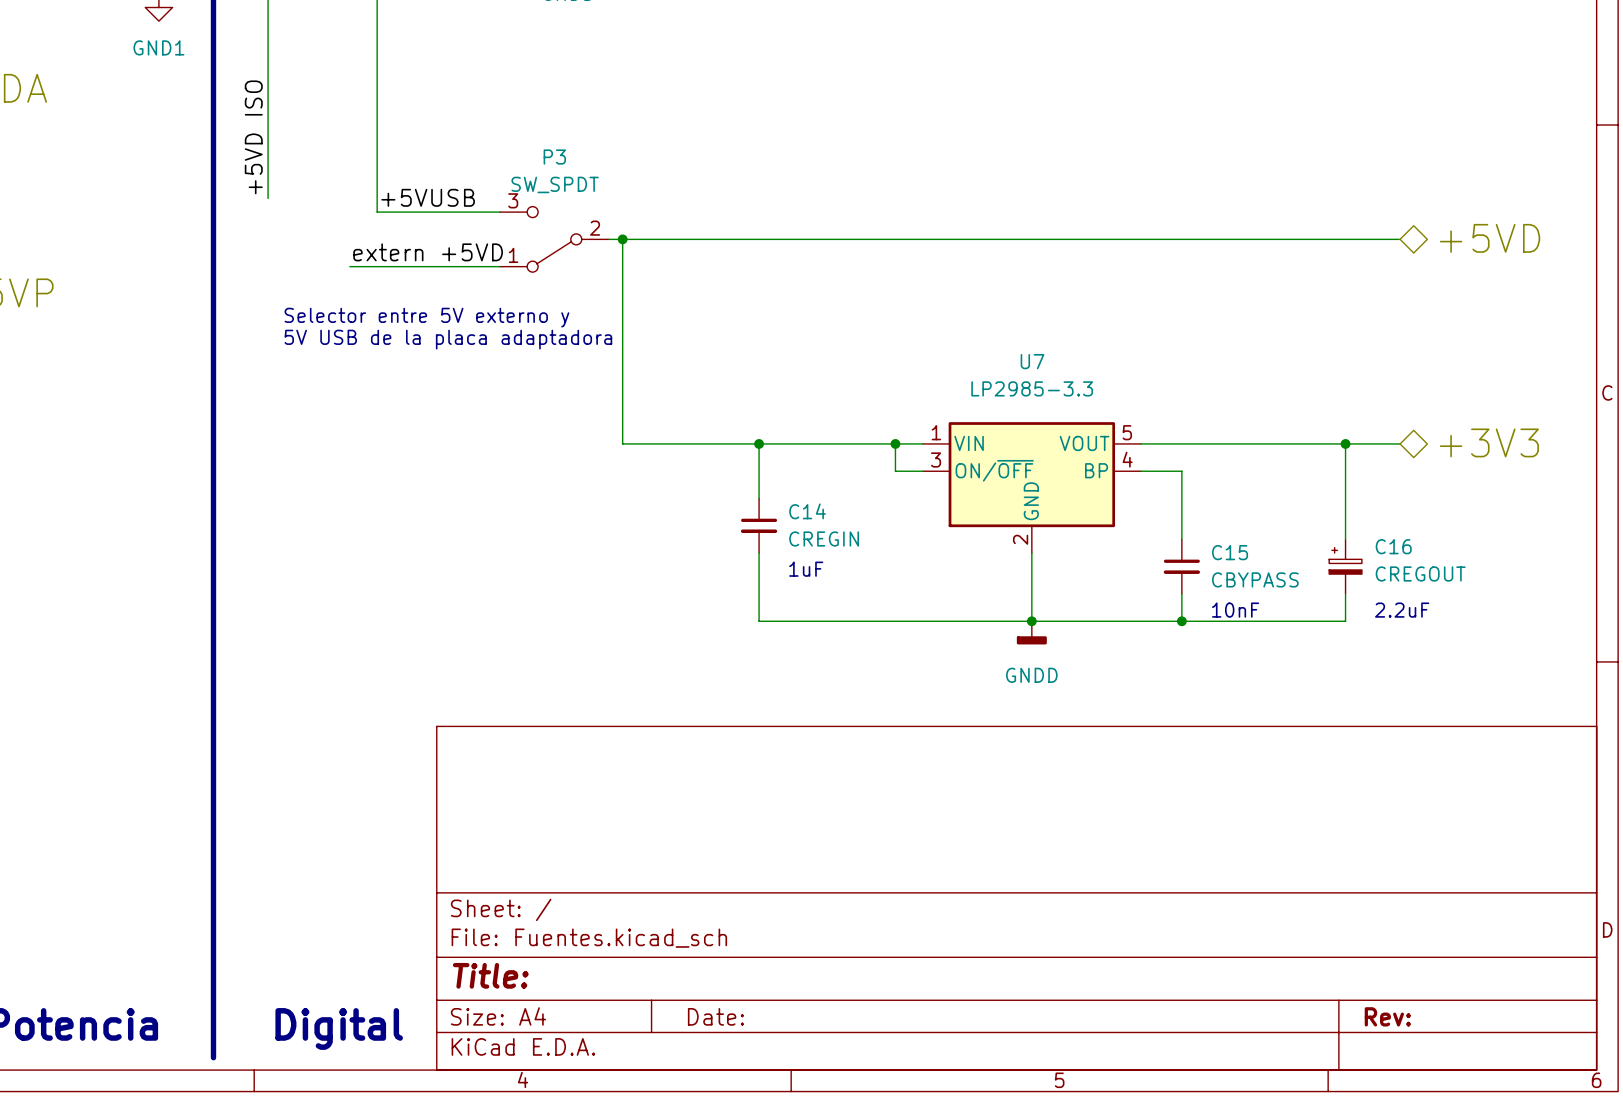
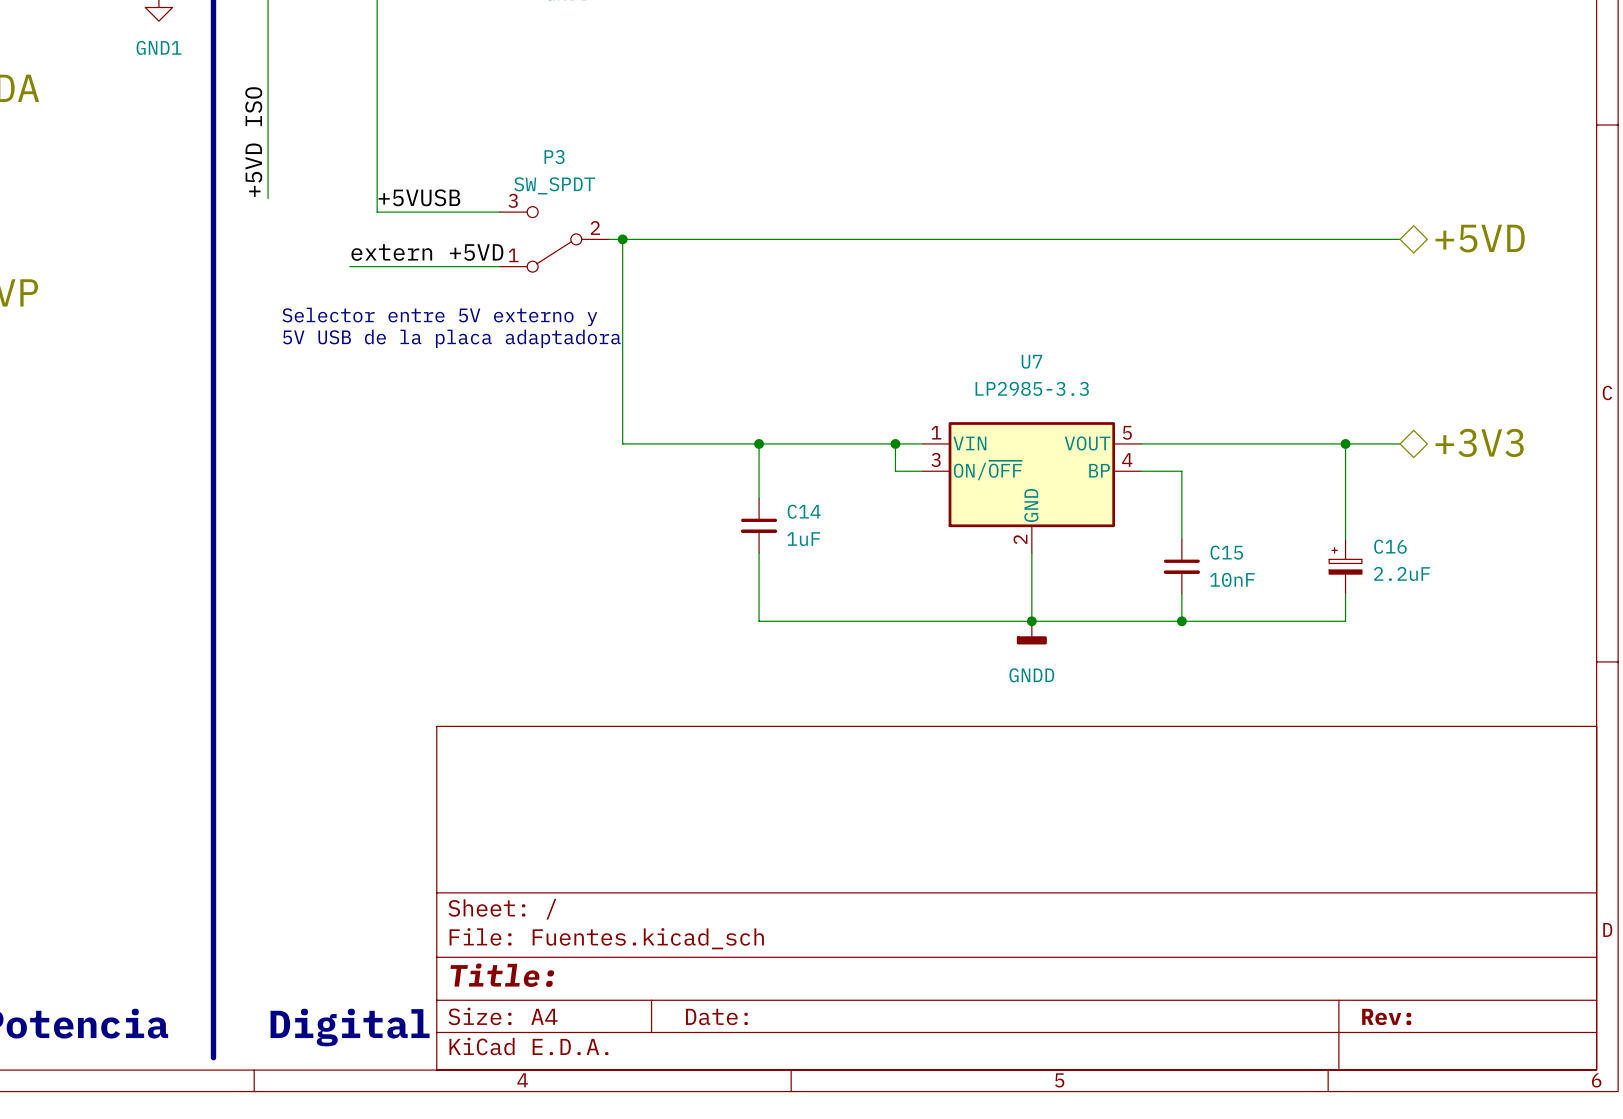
C14 value: CREGIN (824, 538) -> 1uF (803, 539)
text: 1uF (806, 569) -> none
C16 value: CREGOUT (1420, 573) -> 2.2uF (1402, 573)
C15 value: CBYPASS (1255, 579) -> 10nF (1232, 579)
text: 10nF (1235, 610) -> none
text: 2.2uF (1402, 610) -> none

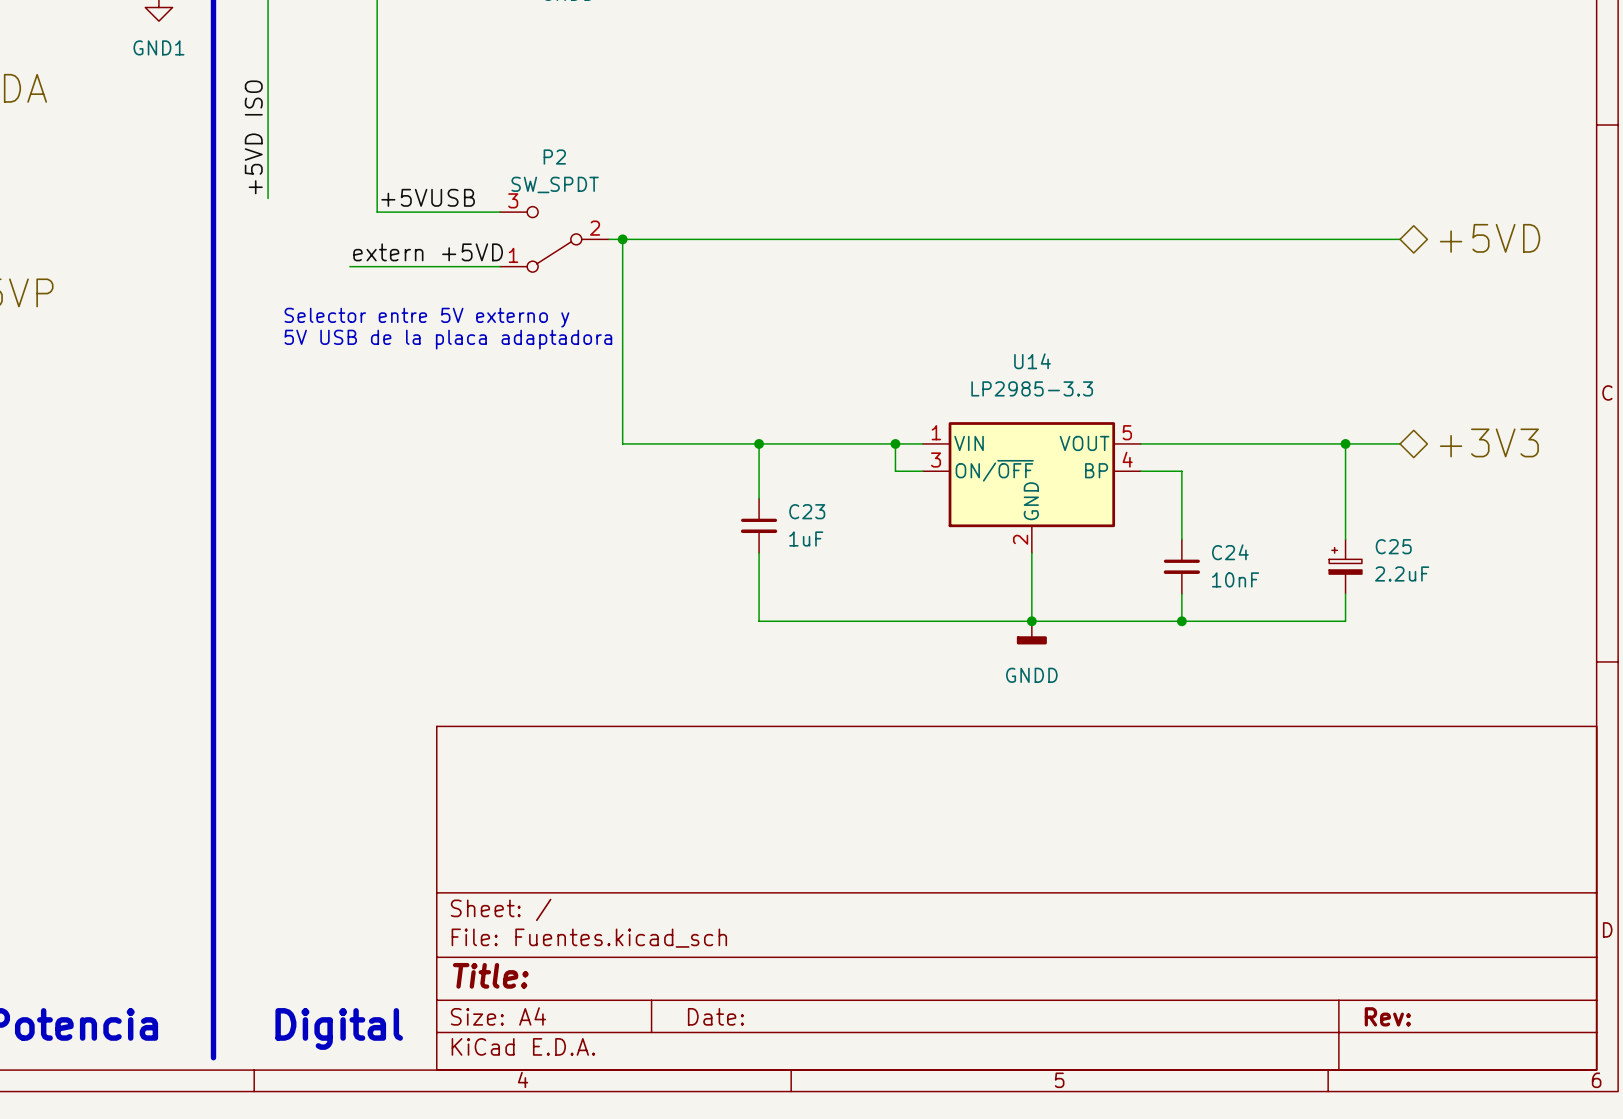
P3 name: P3 (554, 157) -> P2 (554, 157)
U7 name: U7 (1031, 361) -> U14 (1032, 361)
C14 name: C14 (804, 511) -> C23 (807, 511)
C16 name: C16 (1390, 546) -> C25 (1393, 546)
C15 name: C15 (1226, 552) -> C24 (1230, 552)

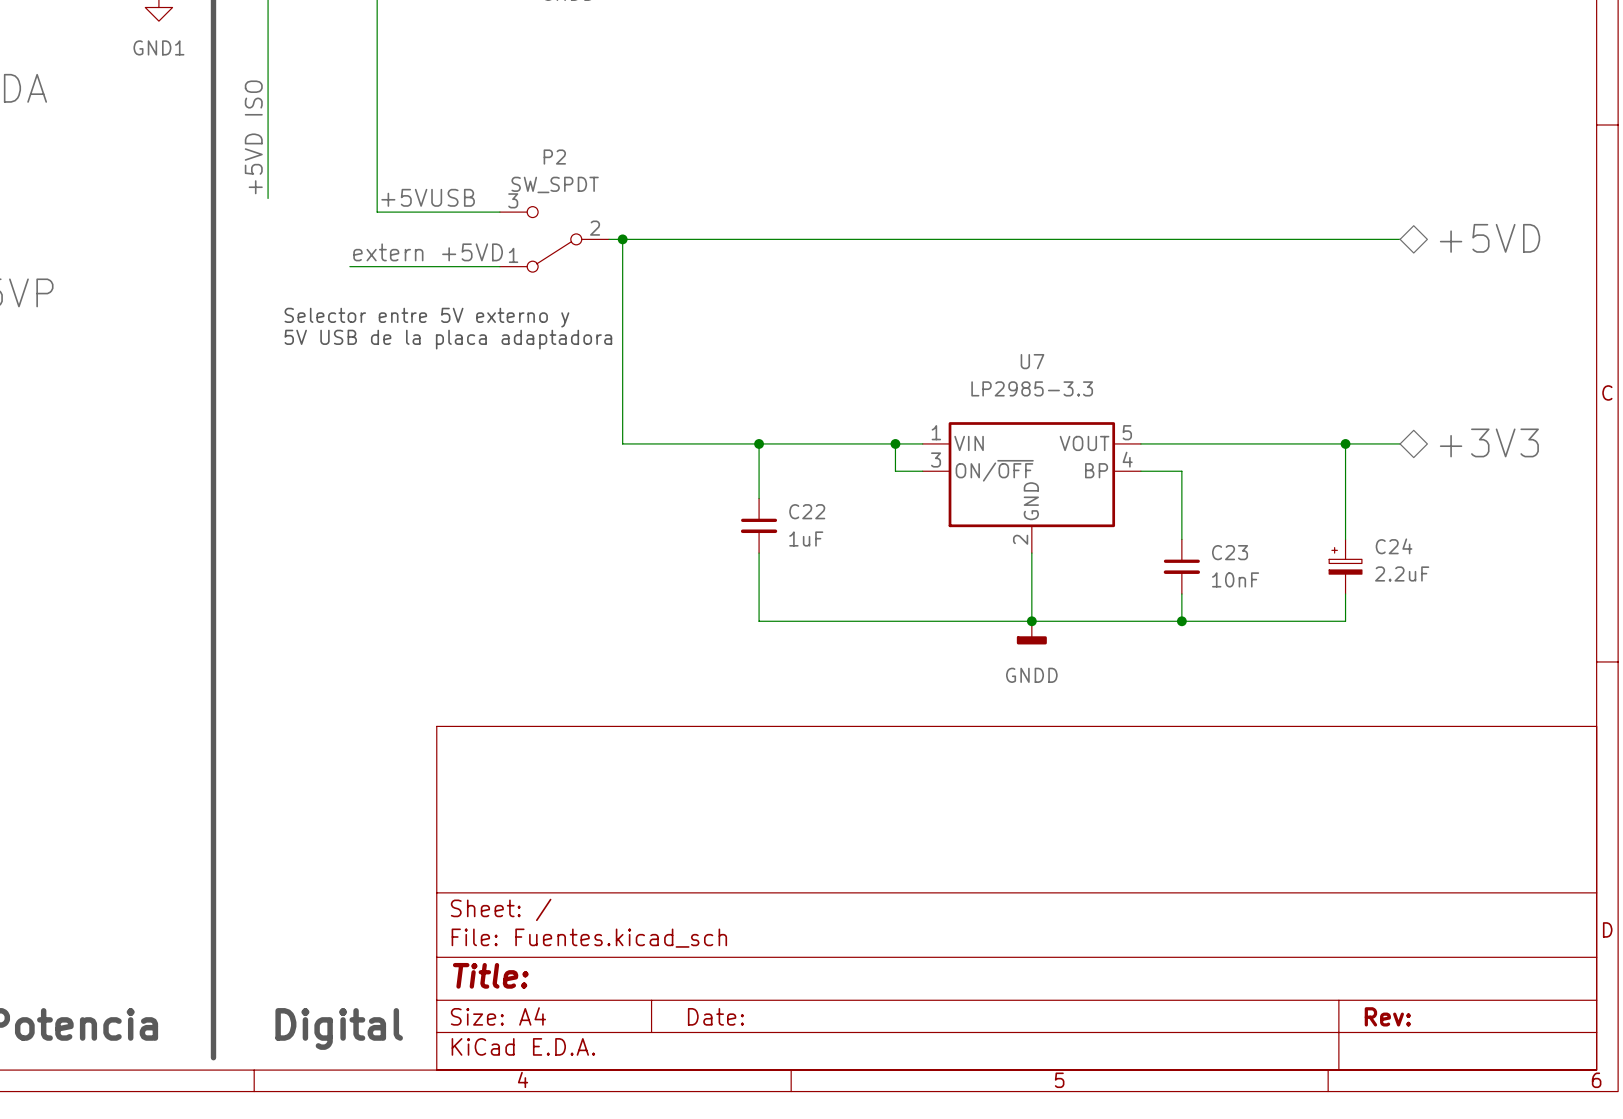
U14 name: U14 (1032, 361) -> U7 (1032, 361)
C23 name: C23 (807, 511) -> C22 (807, 511)
C25 name: C25 (1393, 546) -> C24 (1394, 546)
C24 name: C24 (1230, 552) -> C23 (1230, 552)

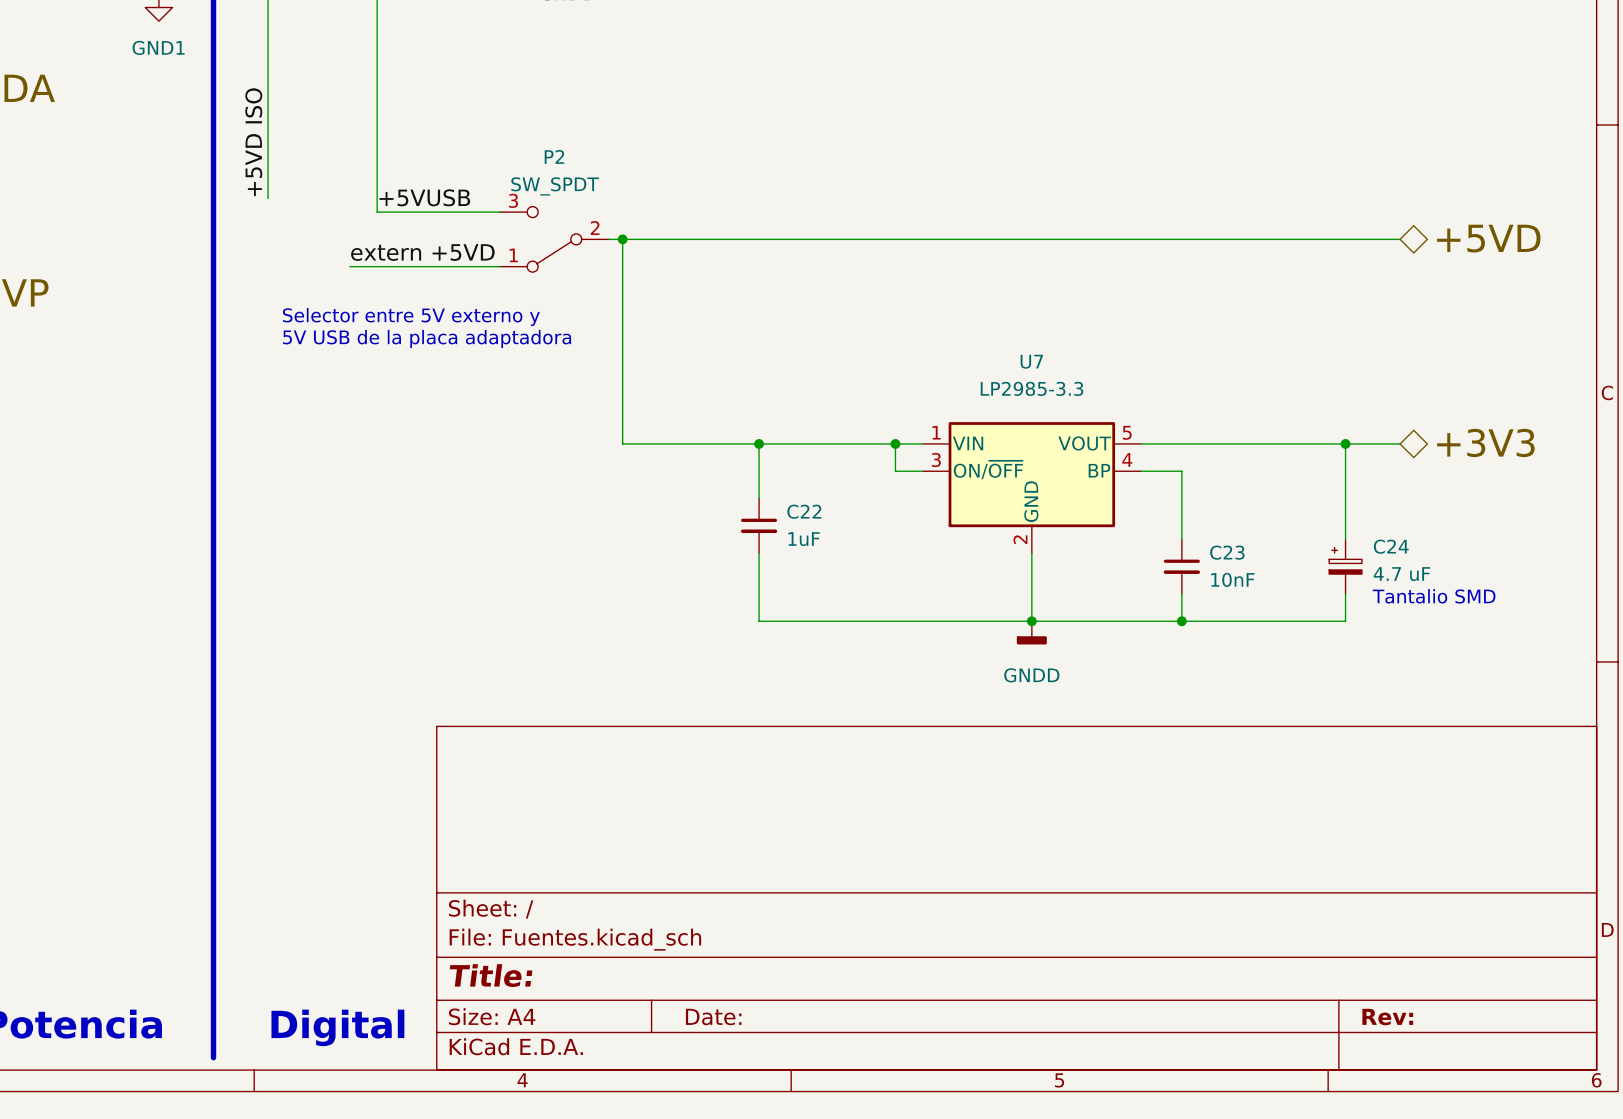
C24 value: 2.2uF (1402, 573) -> 4.7 uF (1401, 574)
text: none -> Tantalio SMD (1434, 596)

